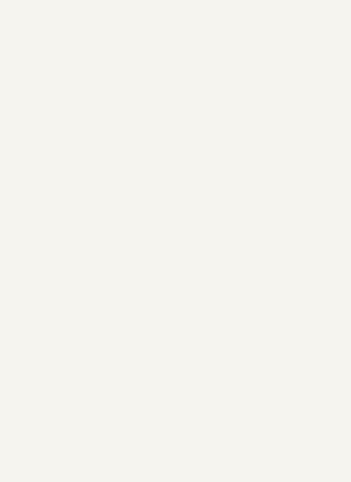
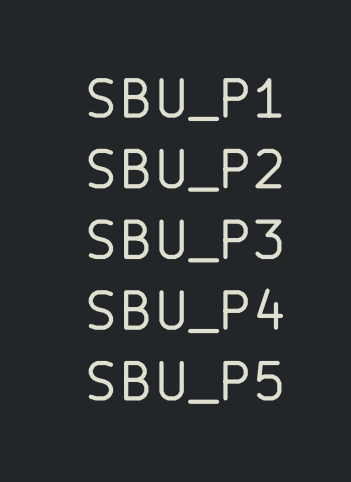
label: none -> SBU_P1 (185, 99)
label: none -> SBU_P2 (185, 170)
label: none -> SBU_P3 (185, 240)
label: none -> SBU_P4 (185, 310)
label: none -> SBU_P5 (185, 382)

